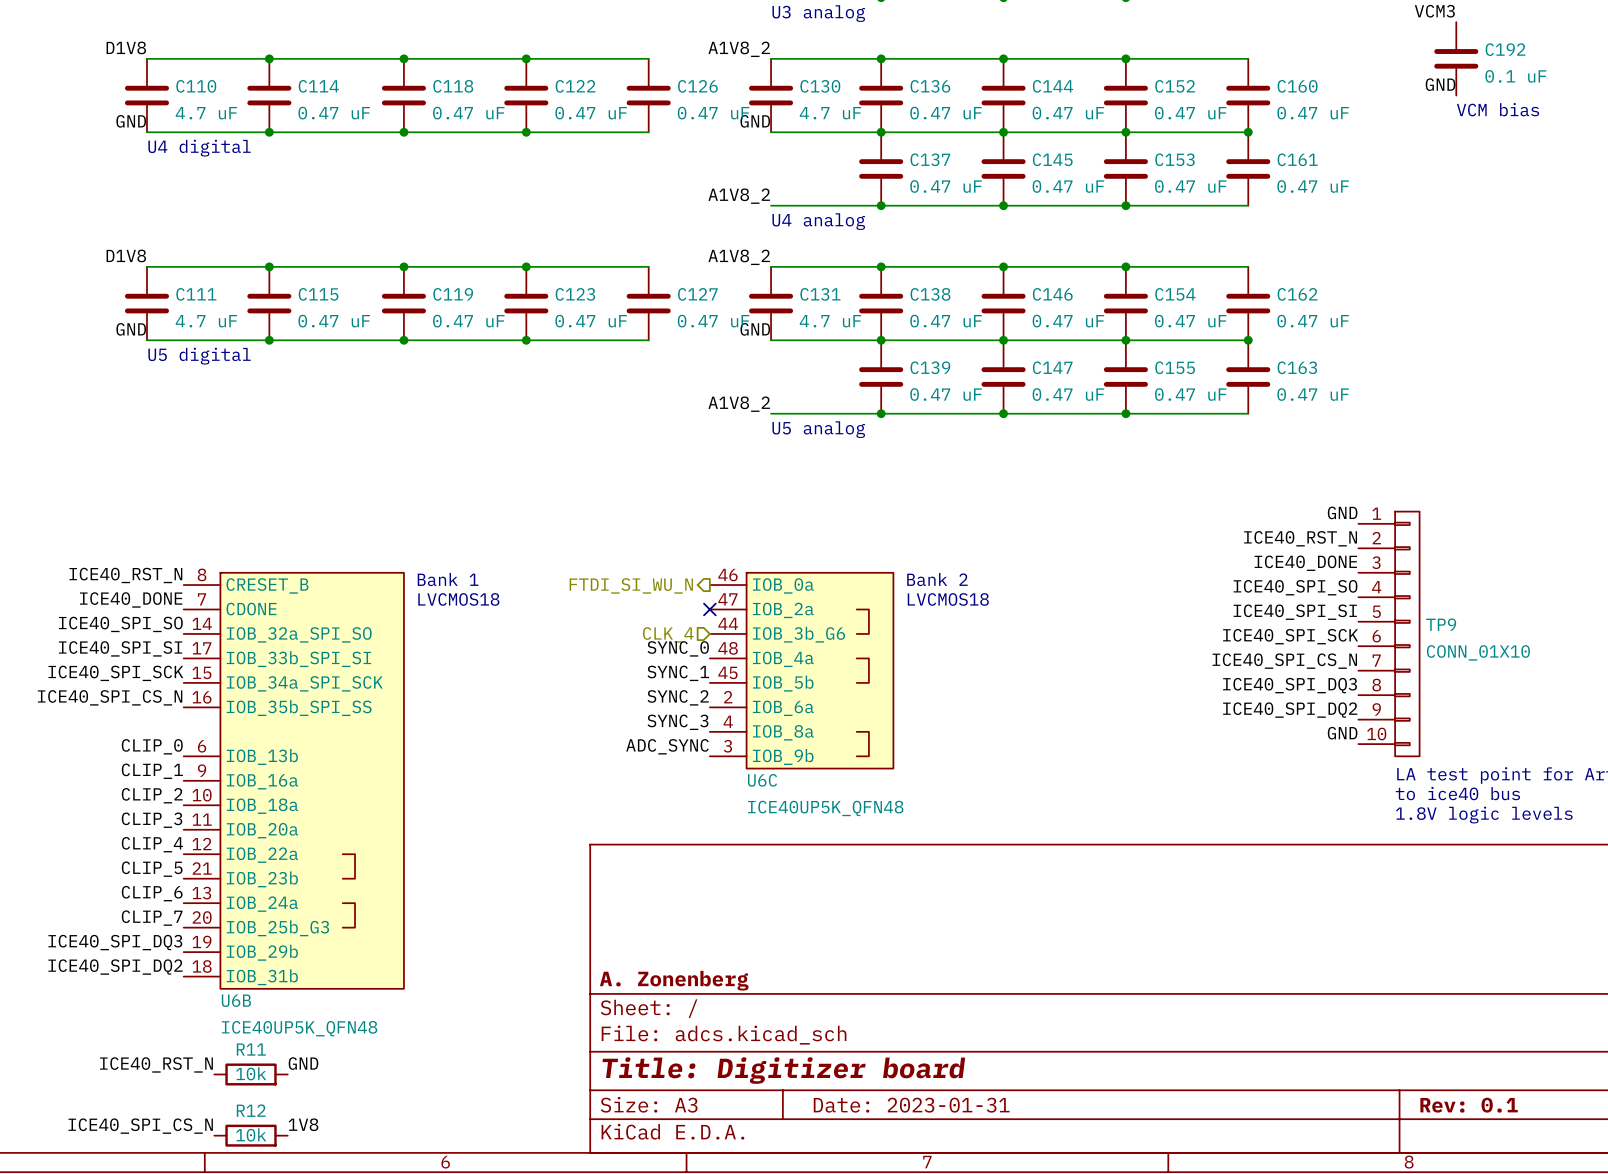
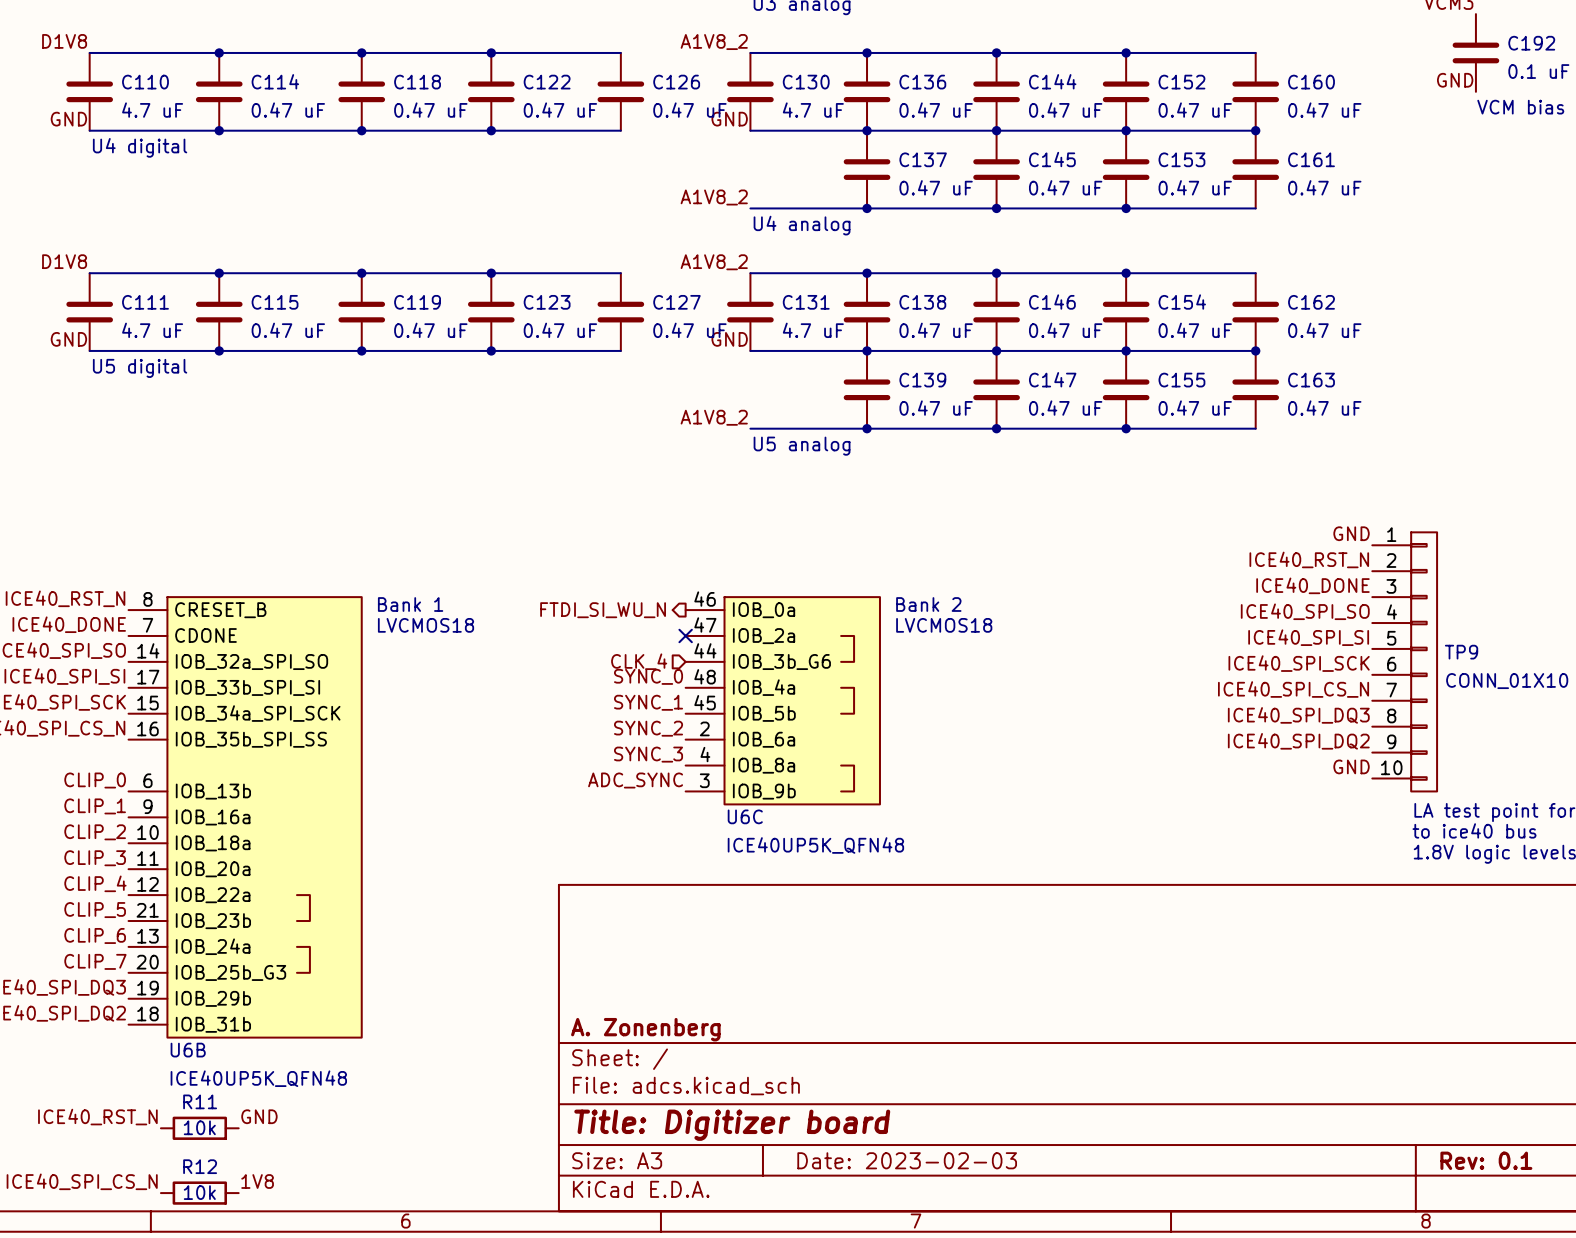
title block: Date: 2023-01-31 (911, 1105) -> Date: 2023-02-03 (907, 1160)

